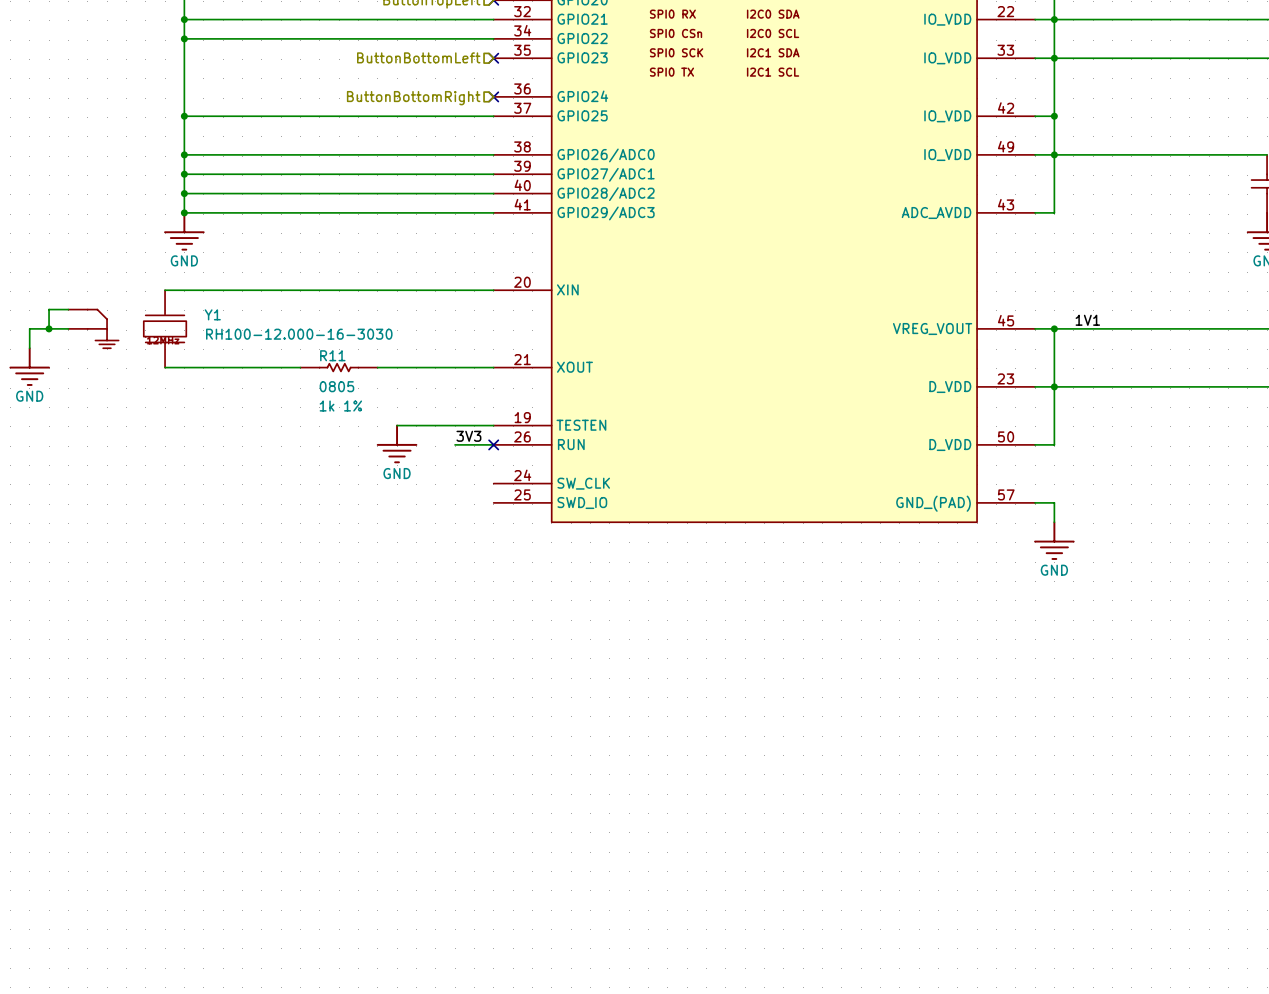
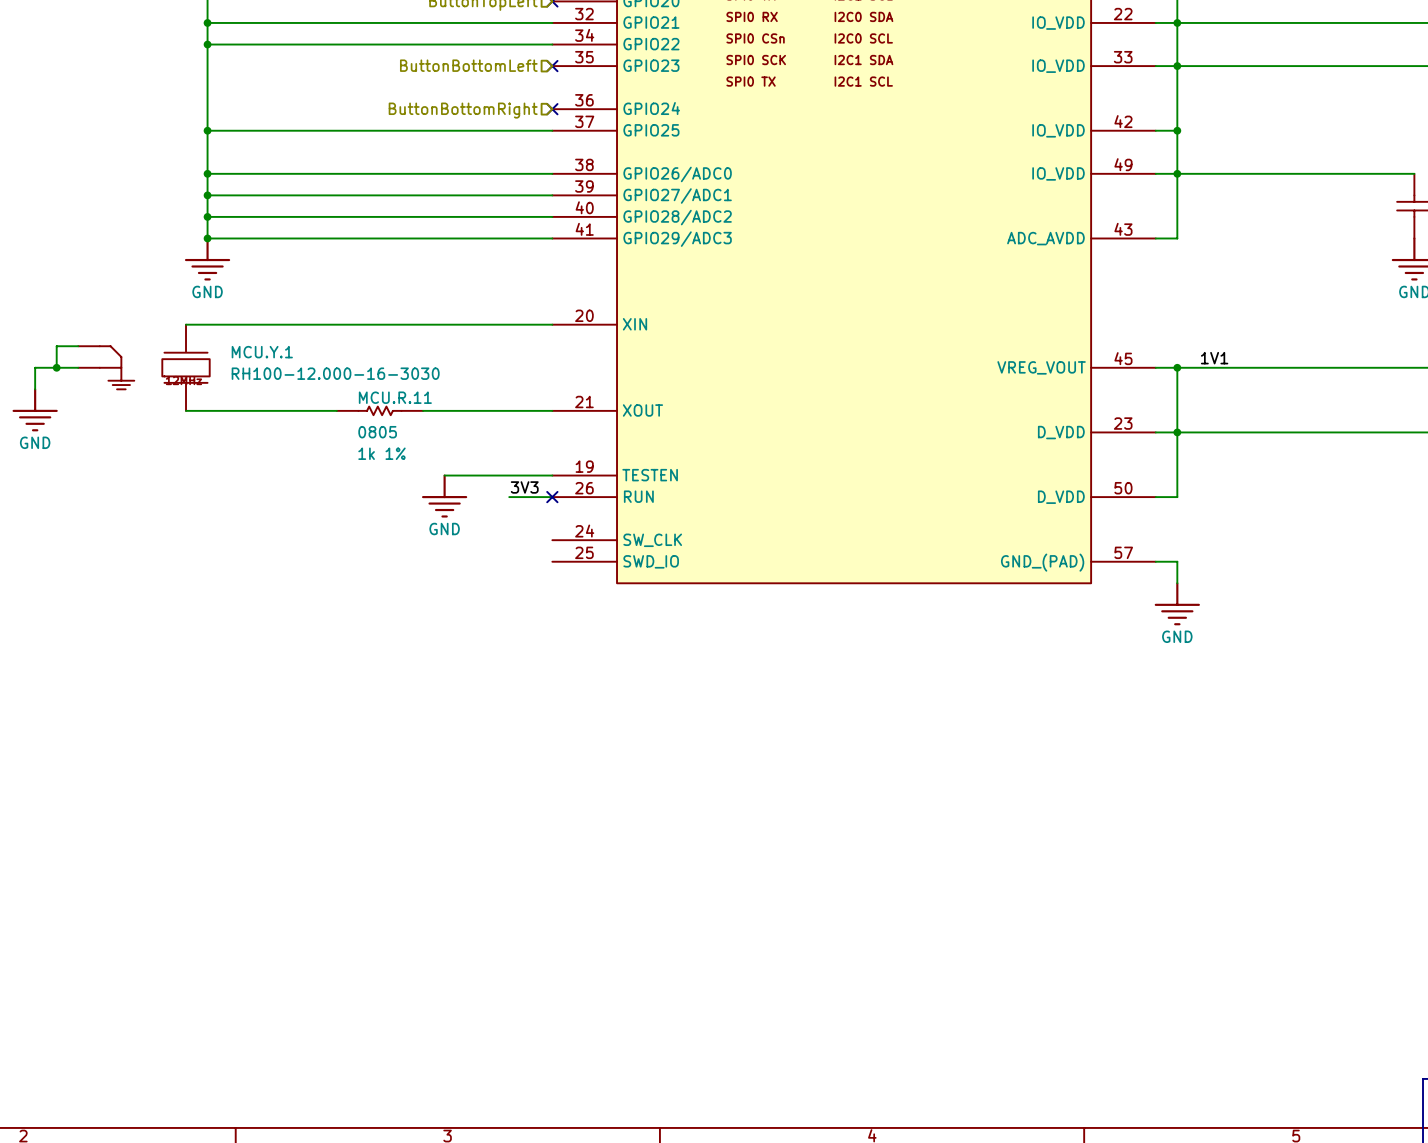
Y1 name: Y1 (212, 314) -> MCU.Y.1 (262, 352)
R11 name: R11 (332, 355) -> MCU.R.11 (395, 397)

